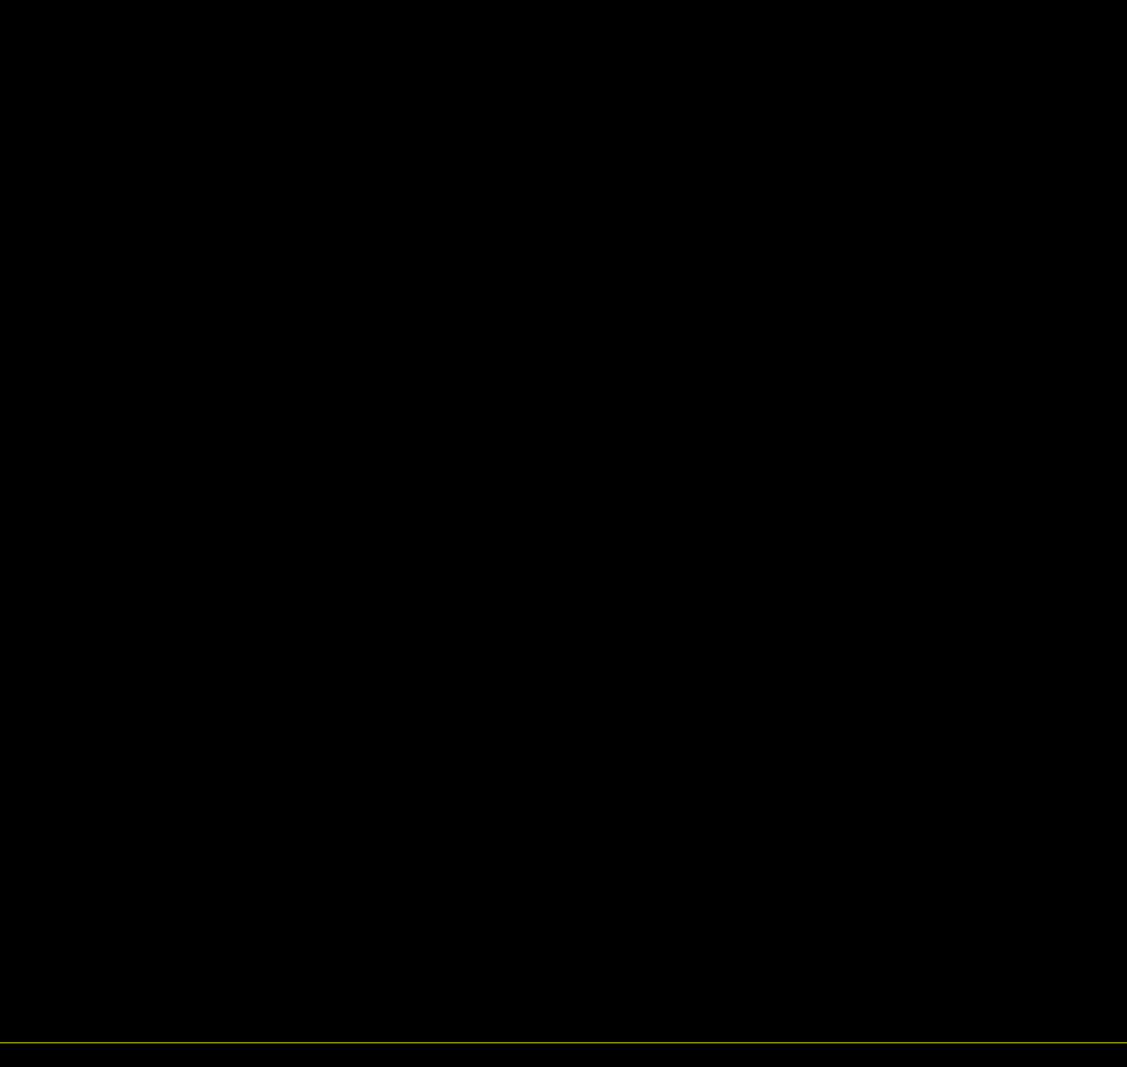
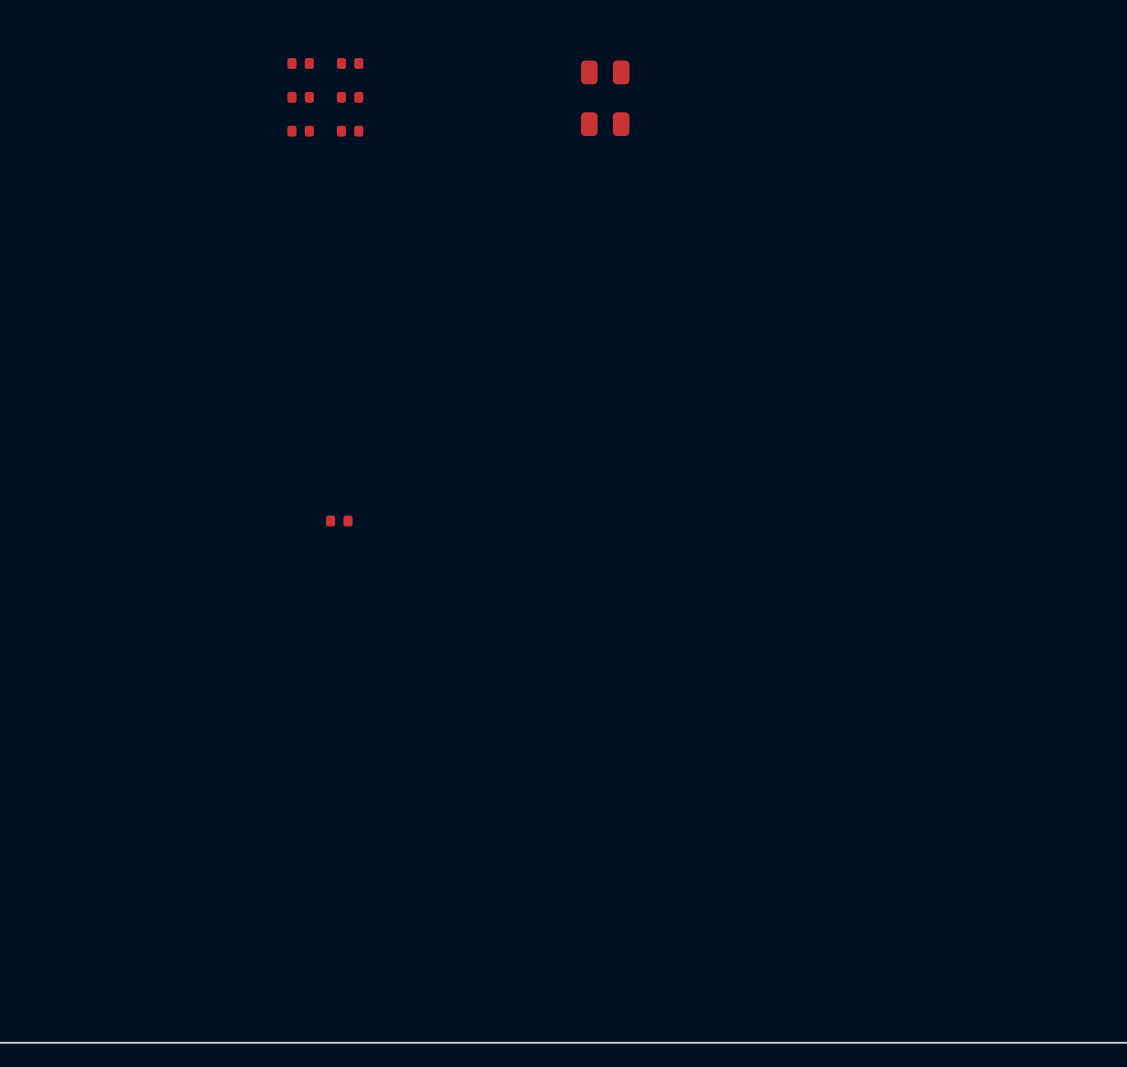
part: none -> (300, 63)
part: none -> (350, 63)
part: none -> (605, 72)
part: none -> (300, 97)
part: none -> (350, 97)
part: none -> (605, 124)
part: none -> (300, 131)
part: none -> (350, 131)
part: none -> (339, 520)

